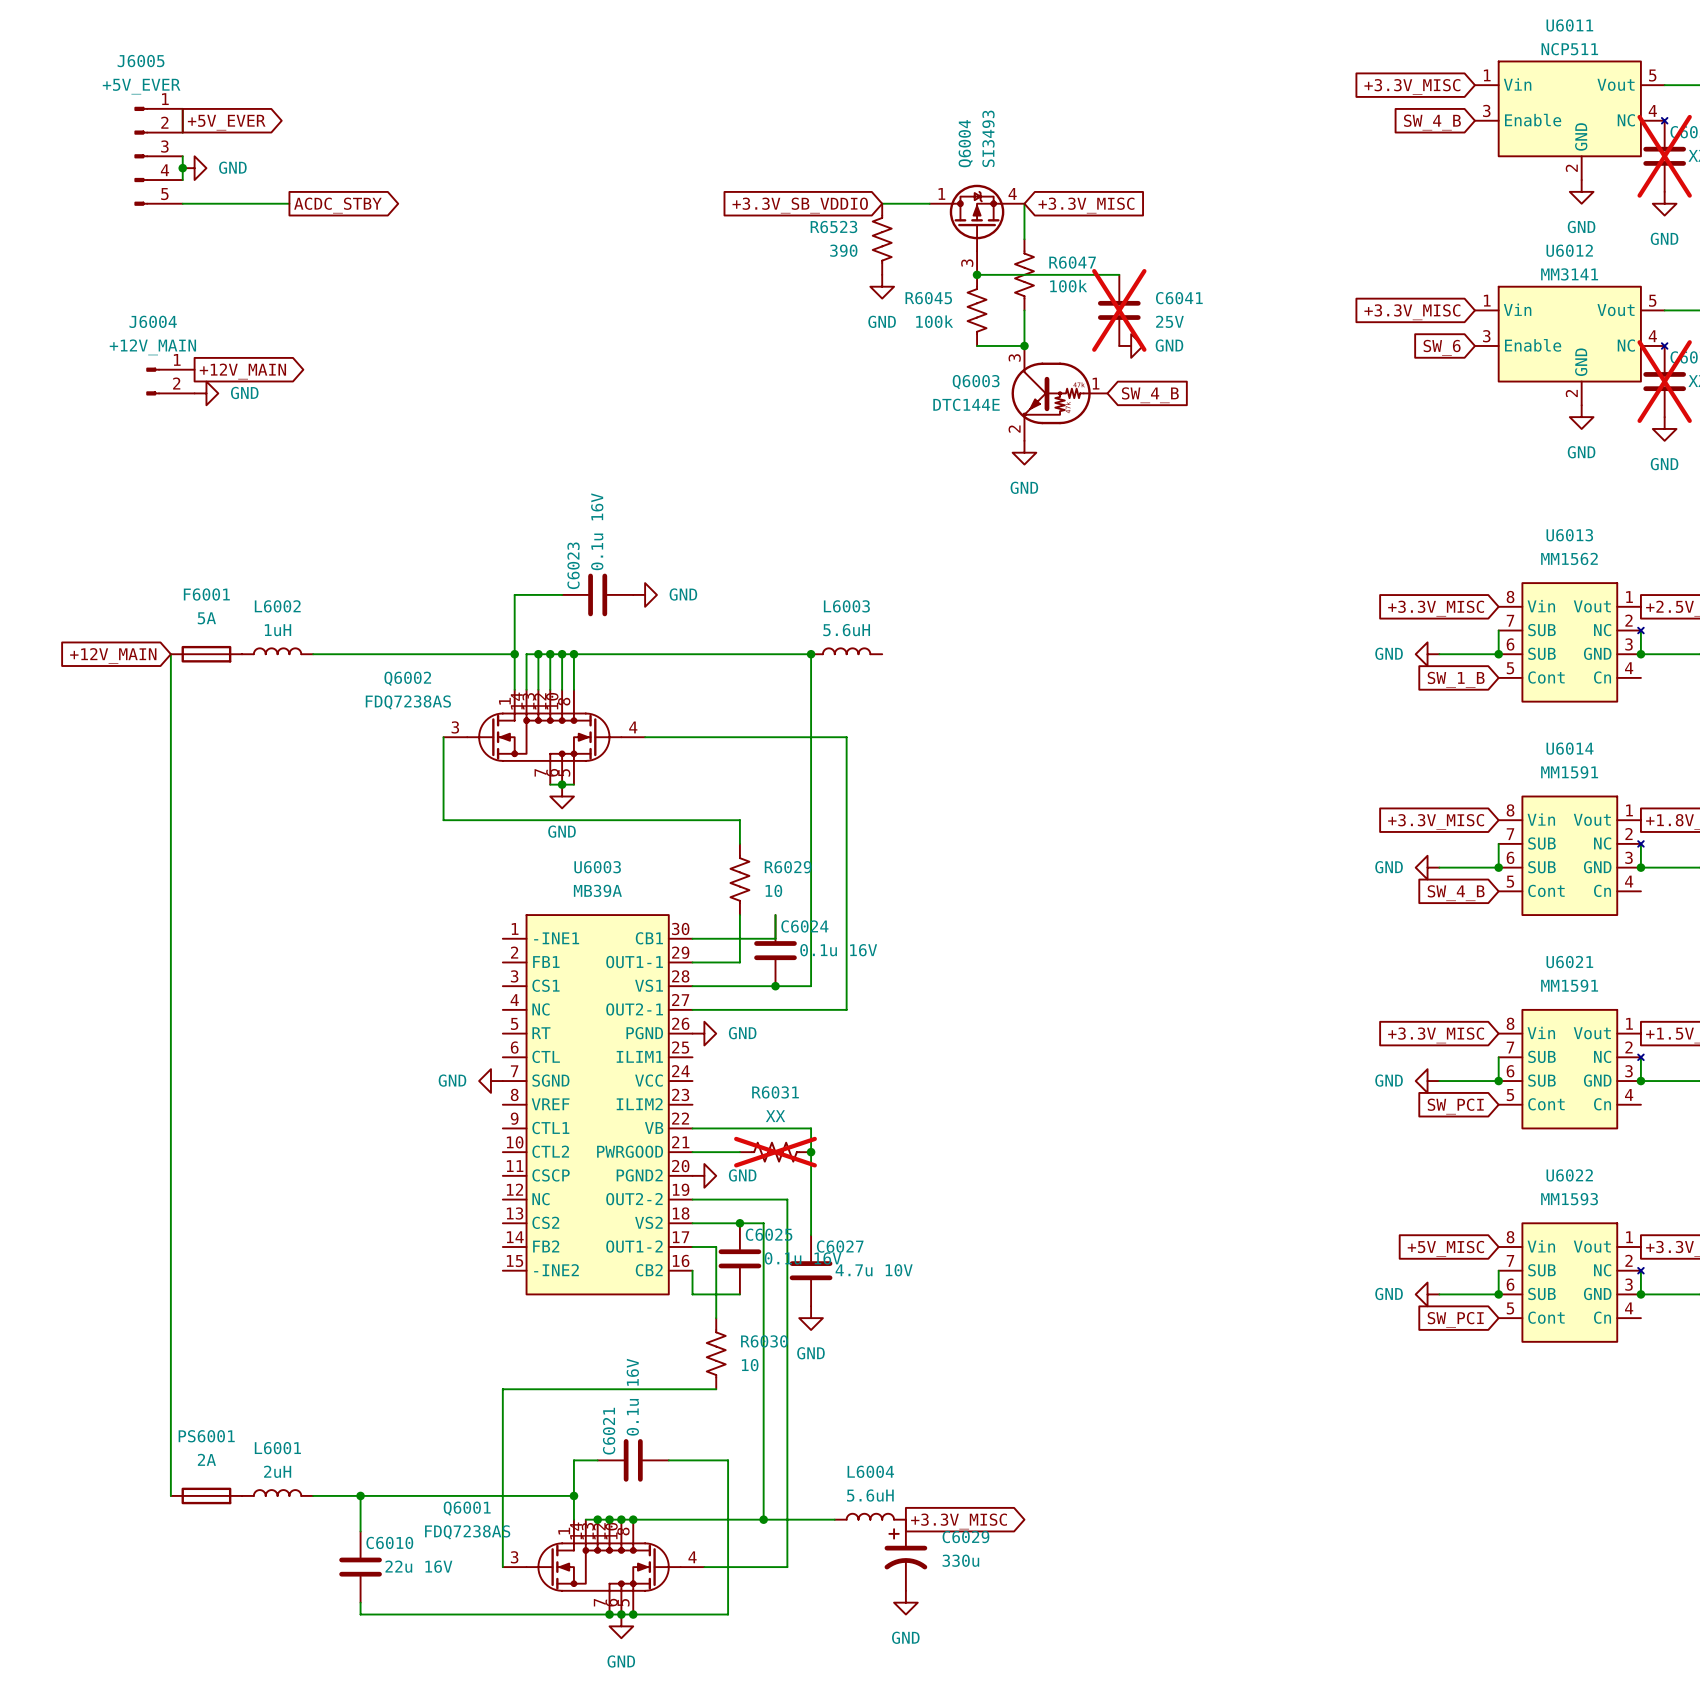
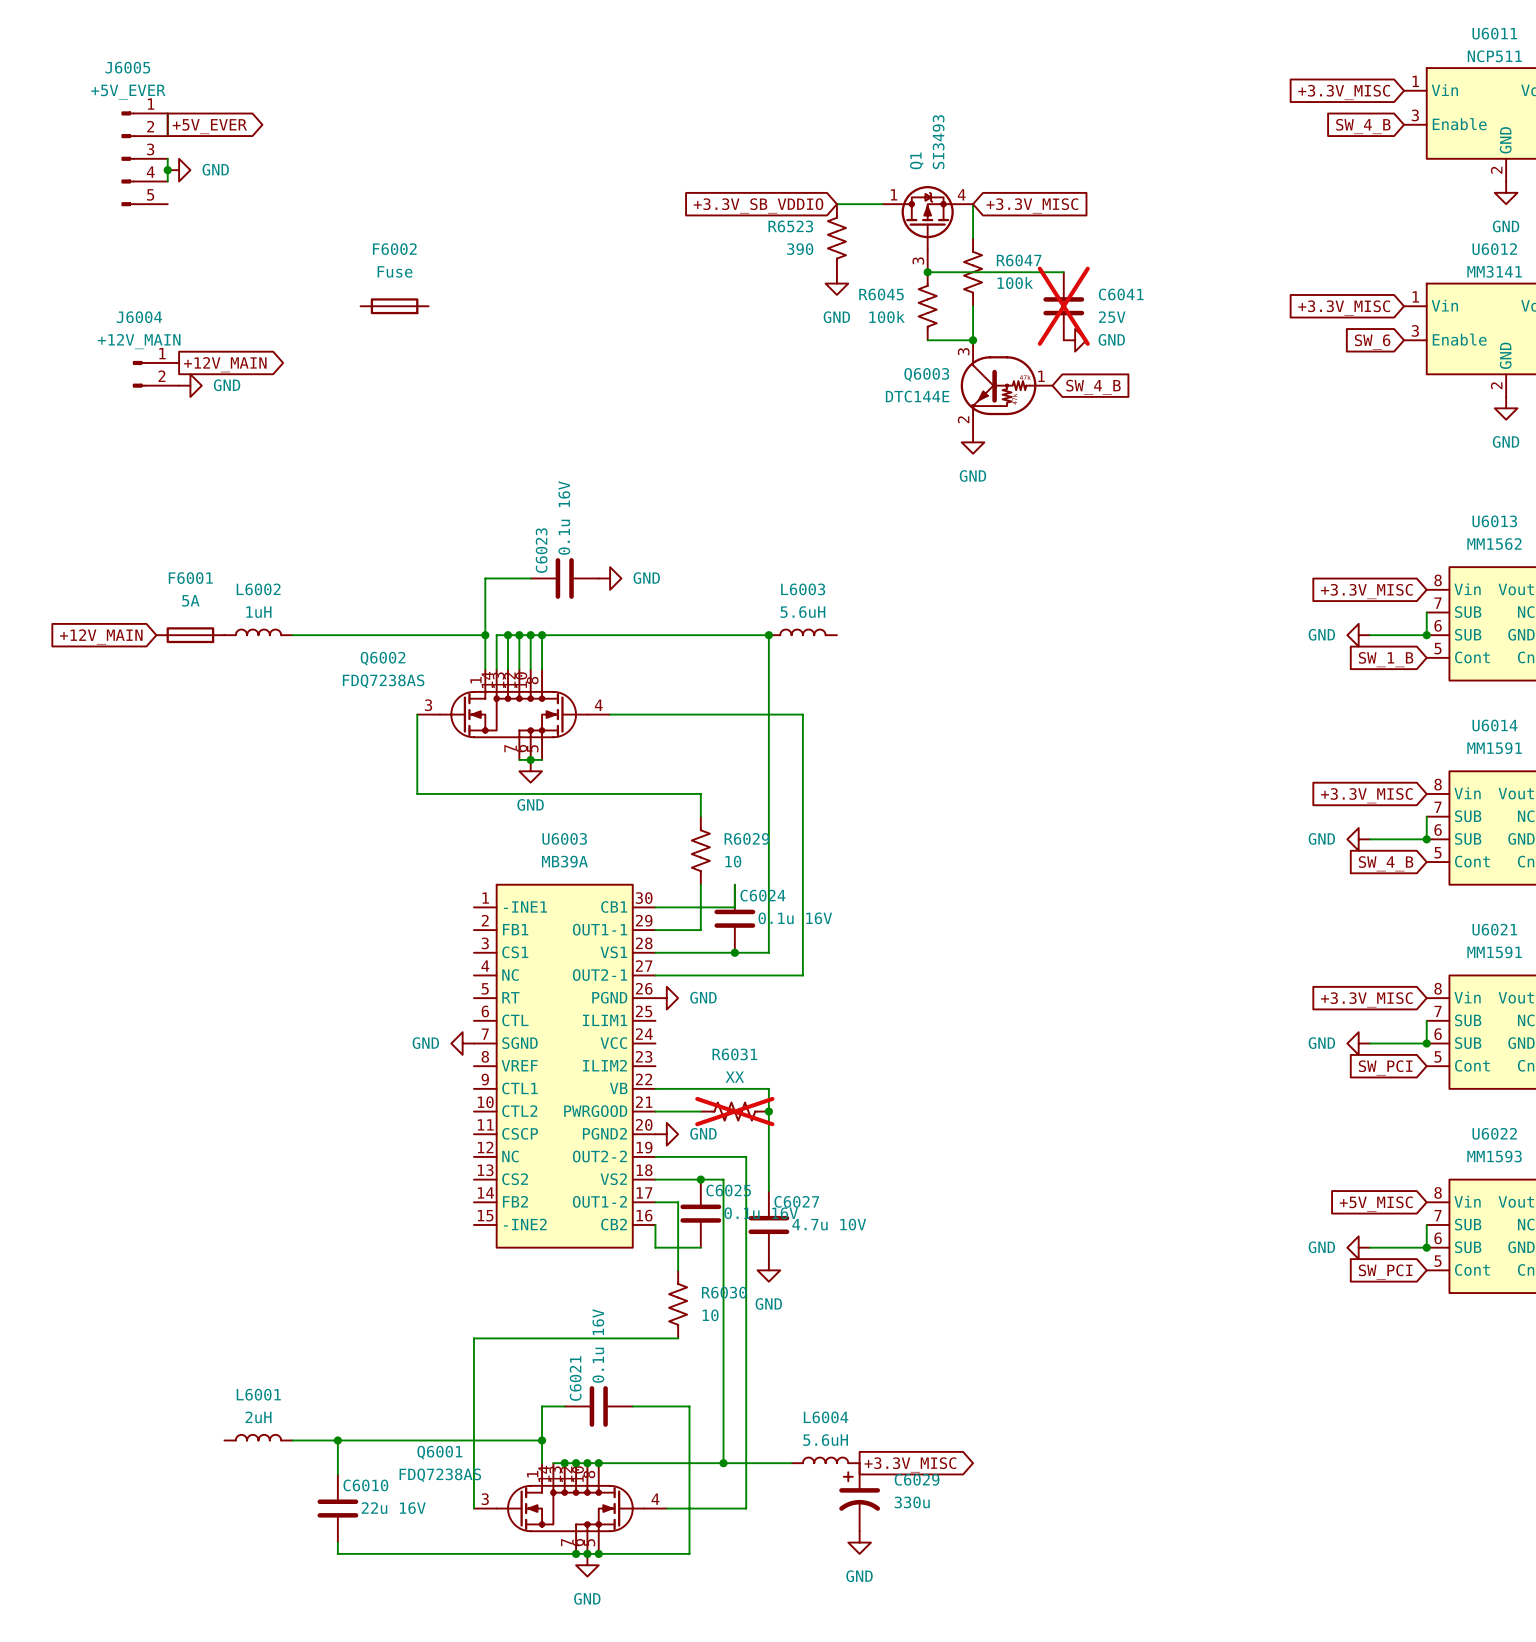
Q6004 name: Q6004 (965, 143) -> Q1 (916, 160)
wire: (182, 203) (289, 203) -> none
global label: ACDC_STBY (337, 205) -> none
F6002: none -> Fuse (394, 306)
wire: (170, 654) (170, 1495) -> none
PS6001: 2A (206, 1495) -> none

